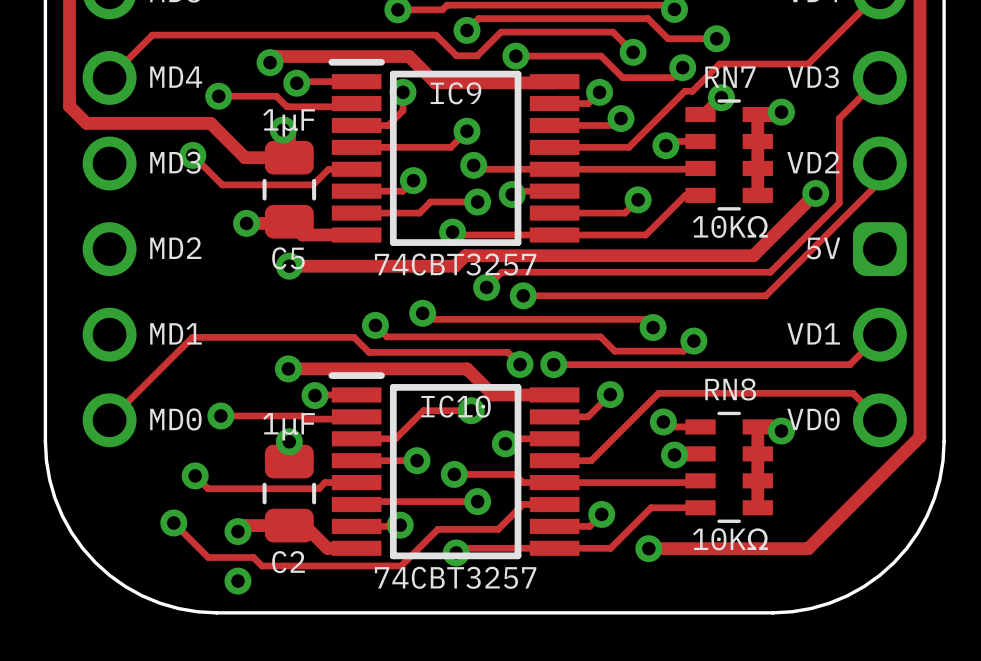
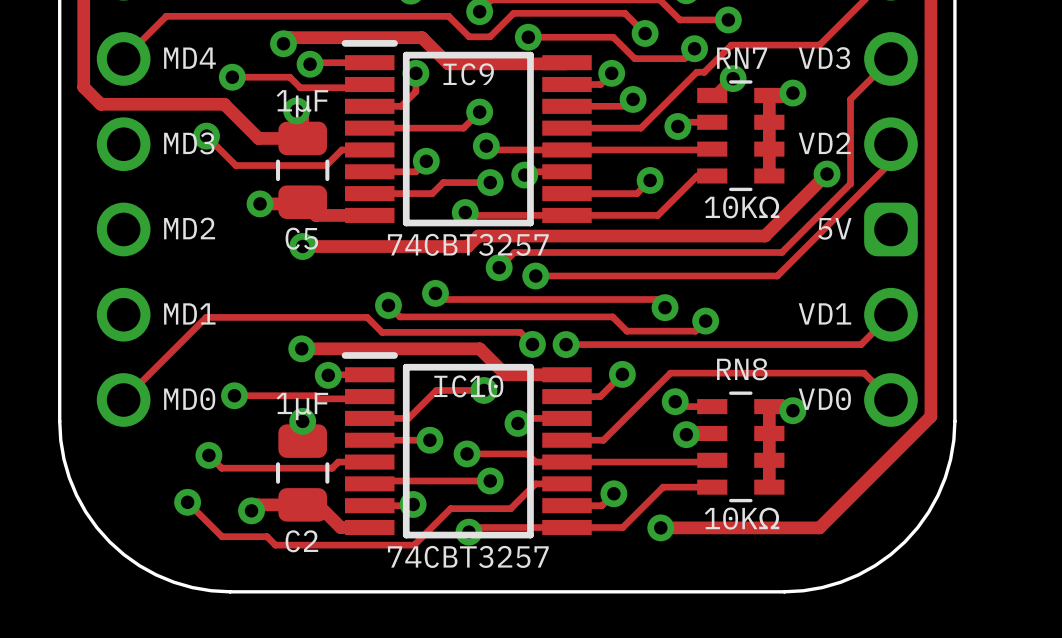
via: (237, 581) -> none

